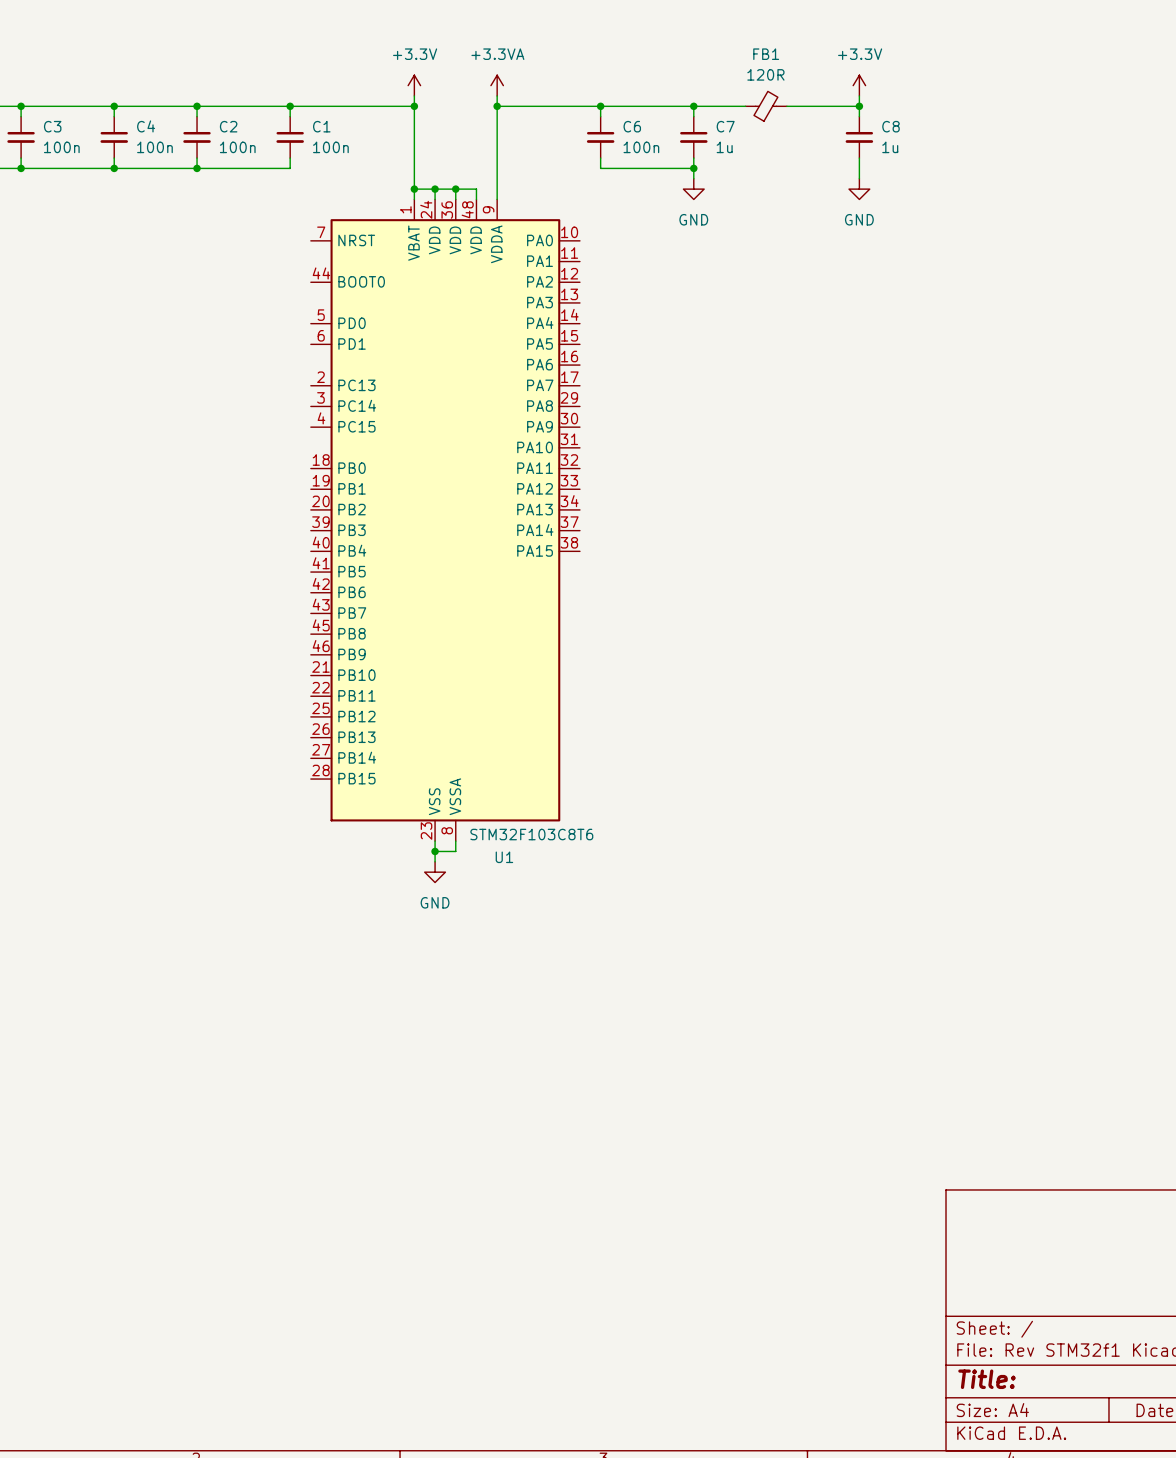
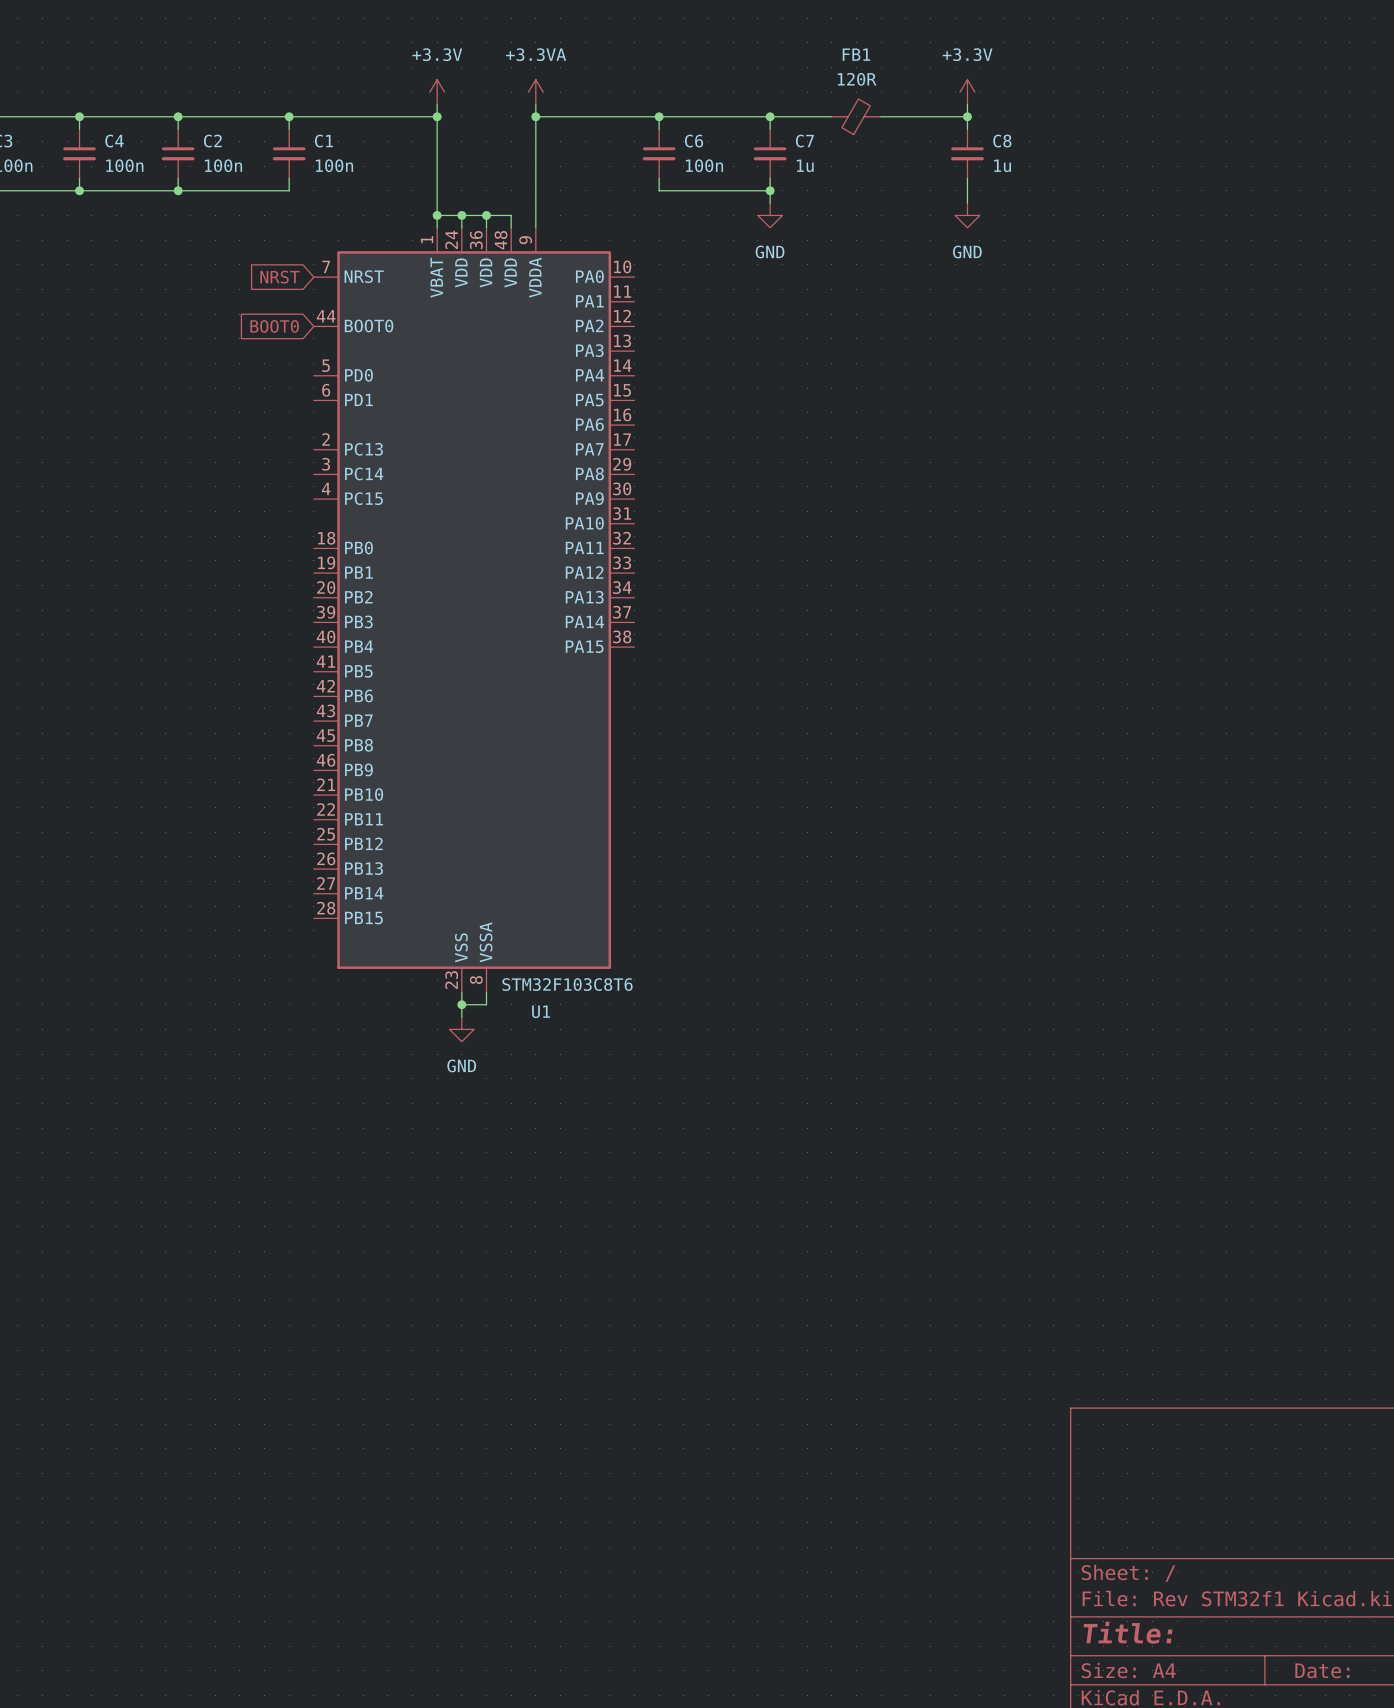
global label: none -> NRST (279, 277)
global label: none -> BOOT0 (274, 326)

